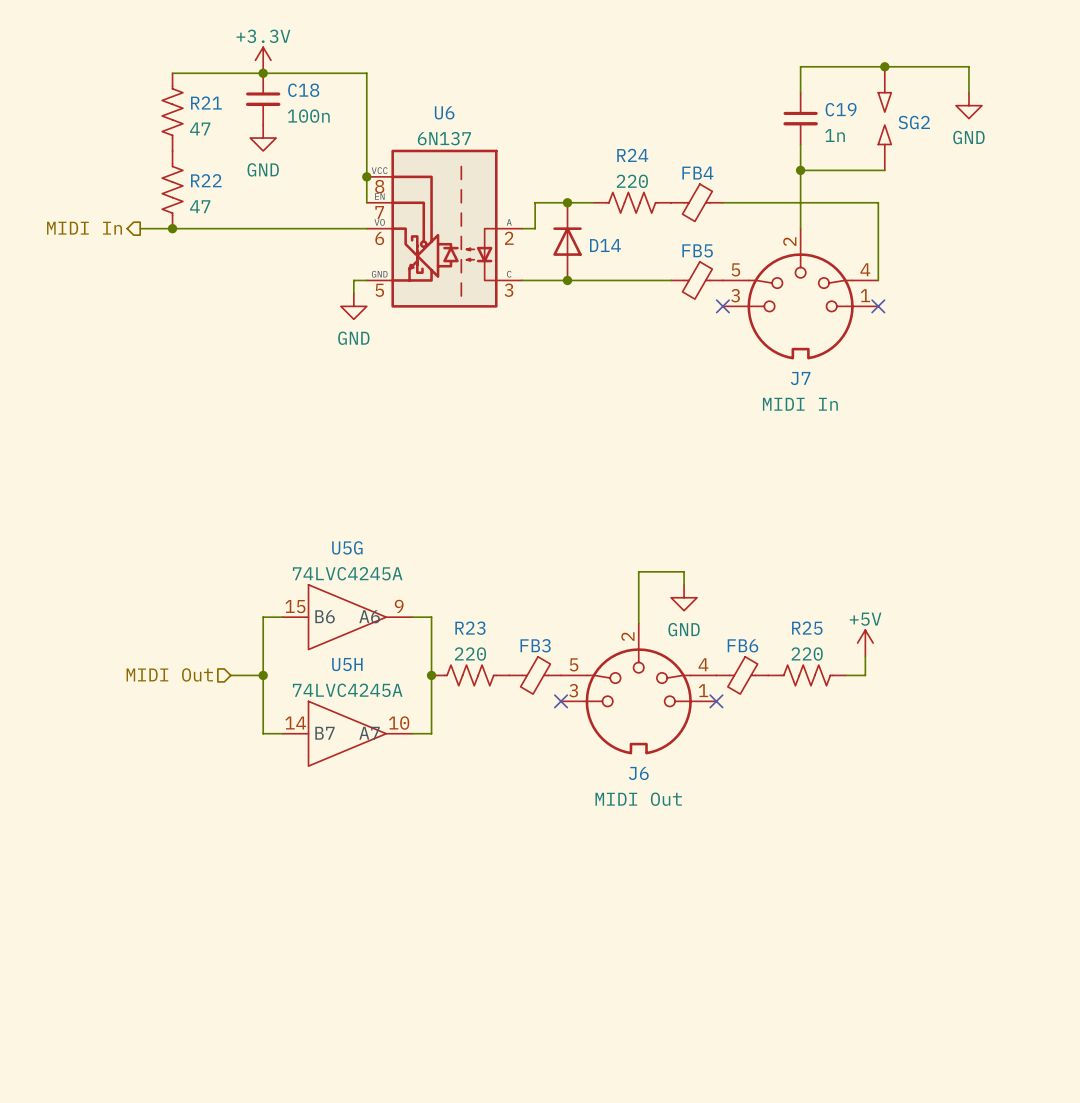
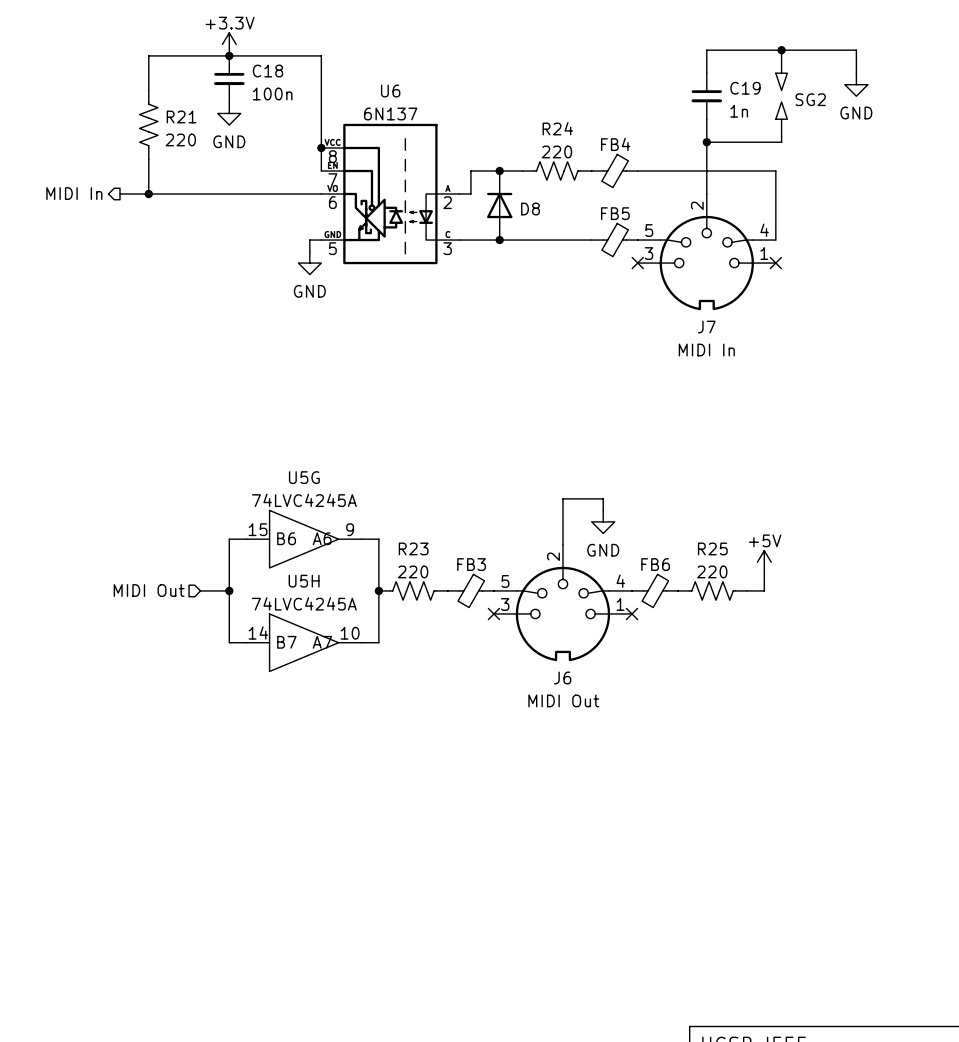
R21 position: (172, 112) -> (148, 124)
R21 value: 47 (200, 128) -> 220 (180, 139)
R22: 47 (172, 189) -> none
D14 name: D14 (605, 245) -> D8 (530, 209)

